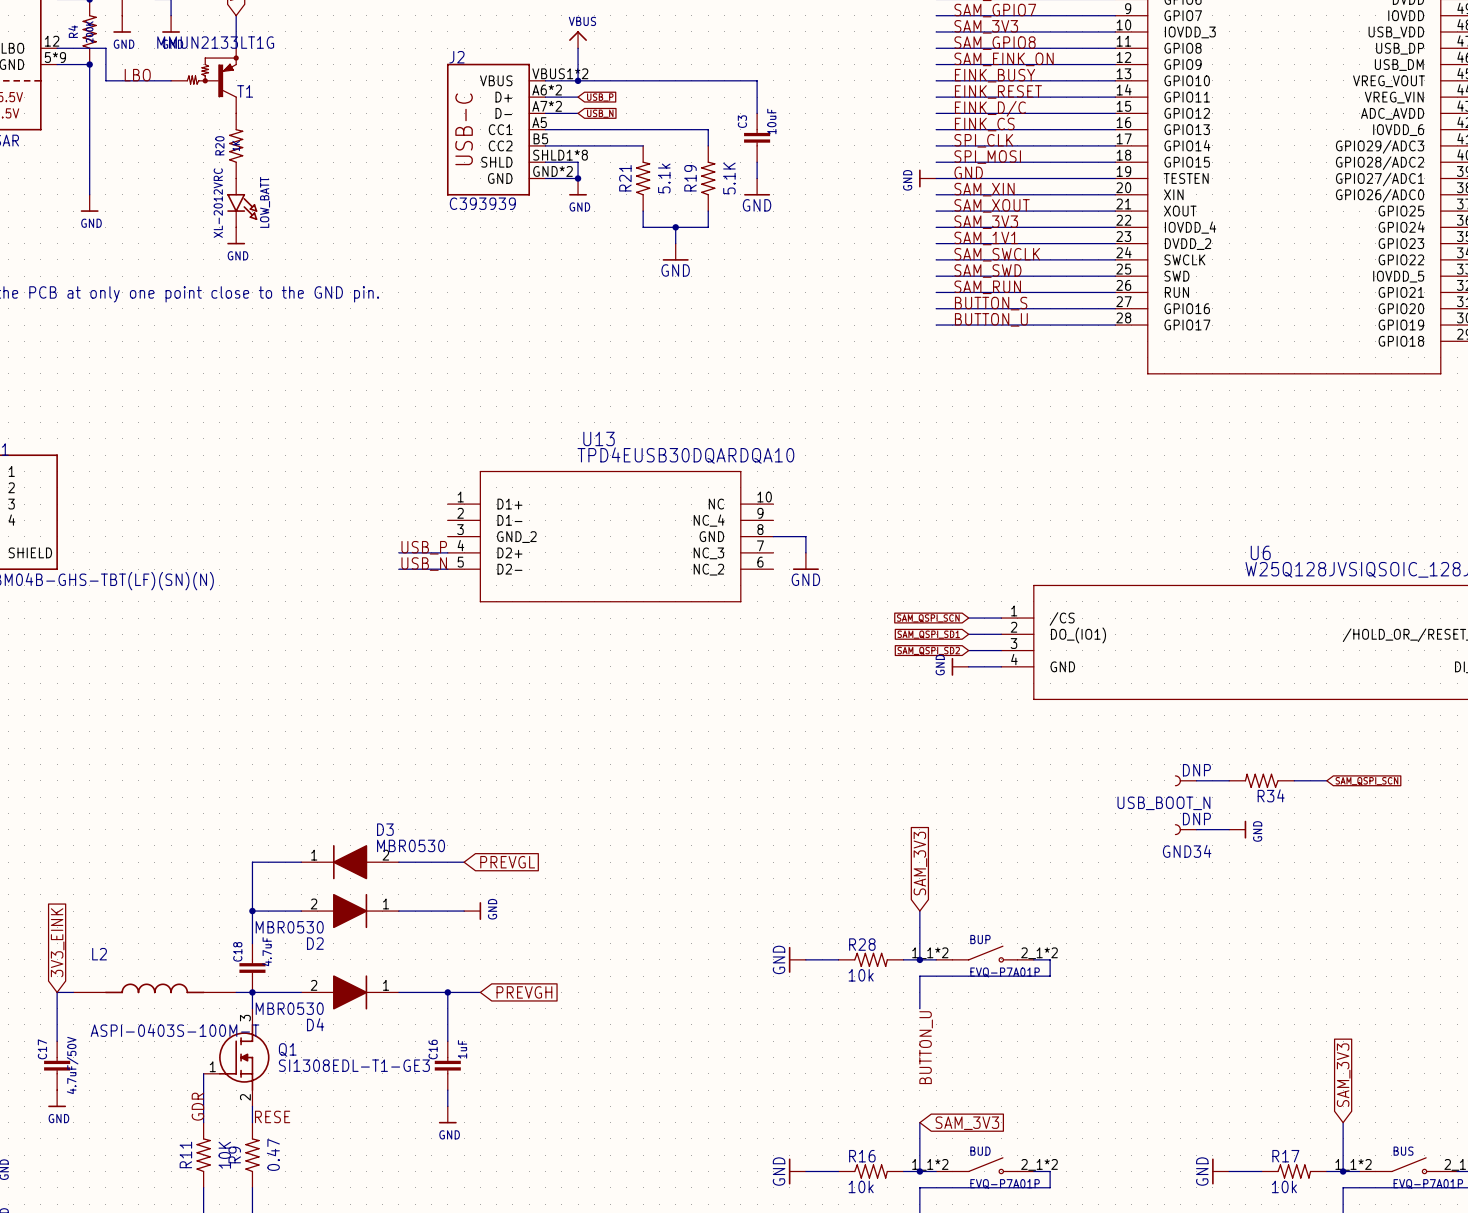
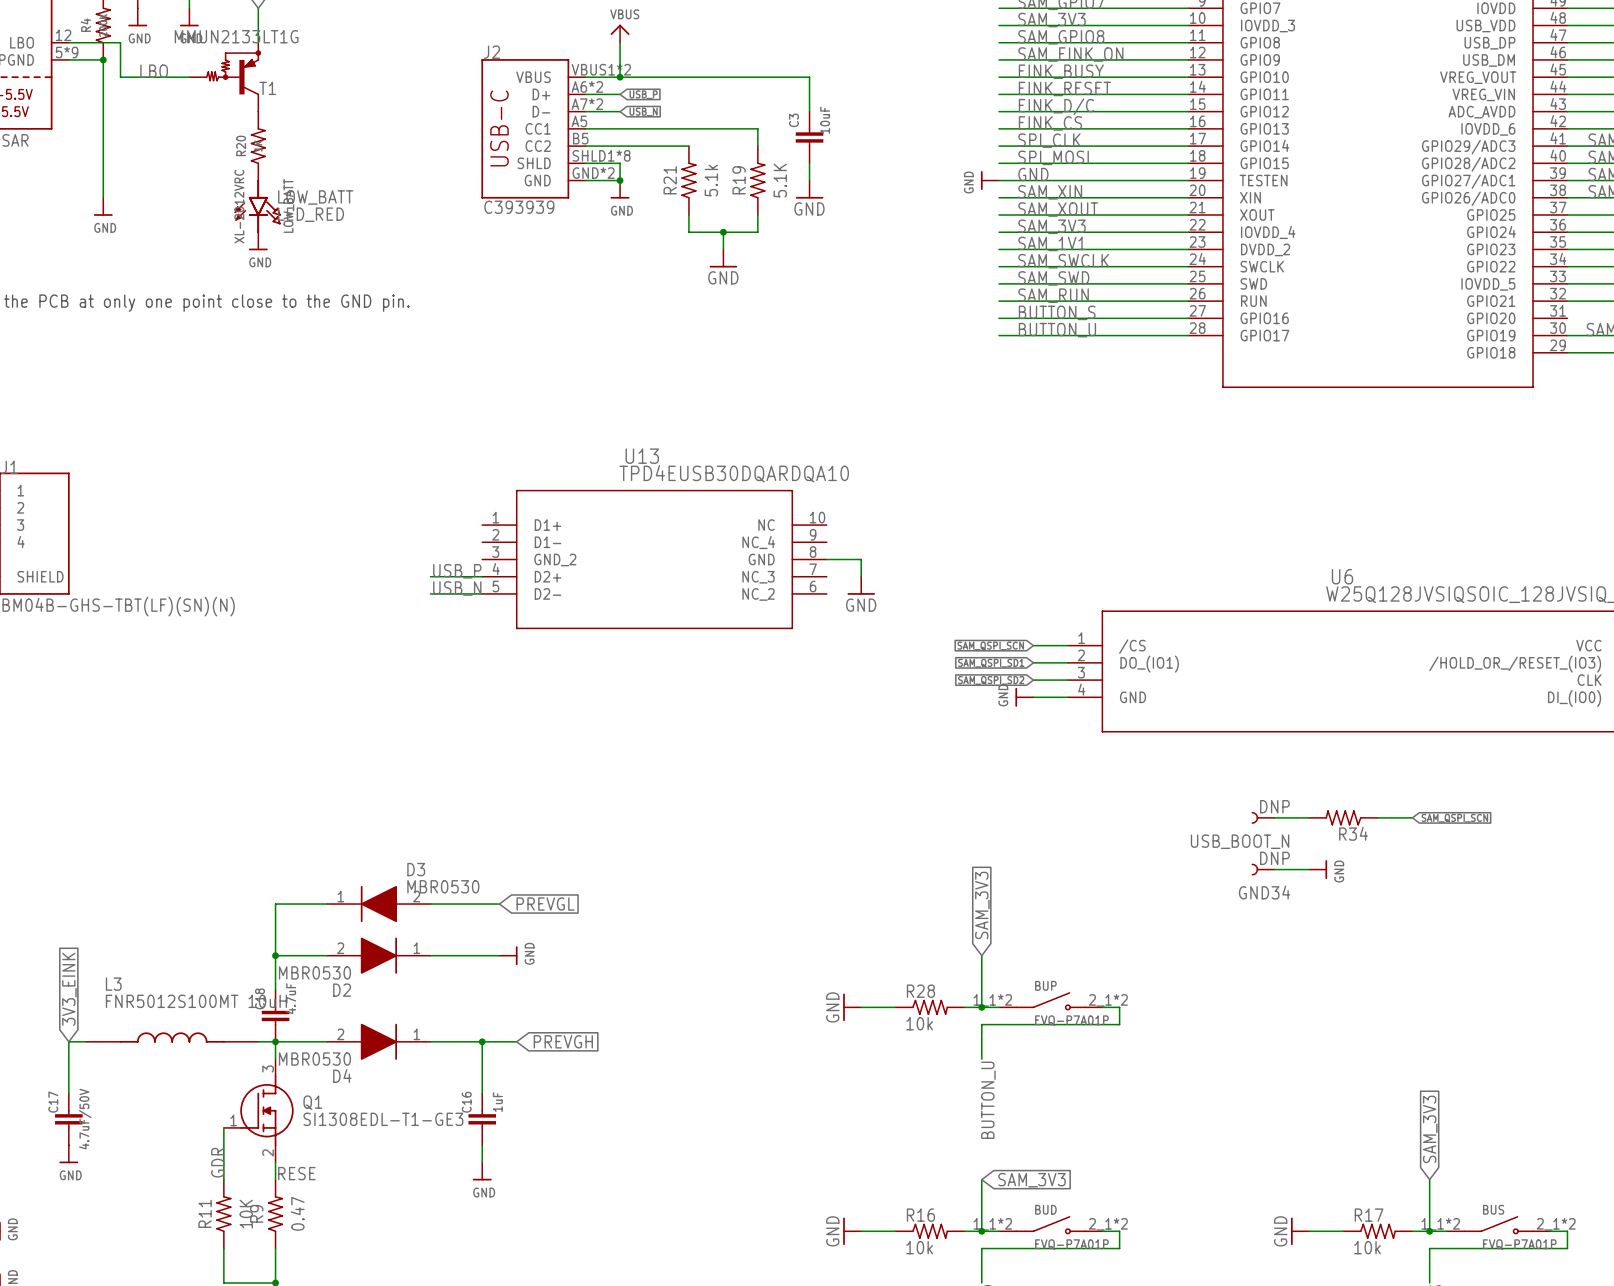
LOW_BATT: none -> LED_RED (251, 206)
L2 name: L2 (99, 954) -> L3 (113, 984)
L2 value: ASPI-0403S-100M-T (175, 1030) -> FNR5012S100MT 10uH (196, 1001)

